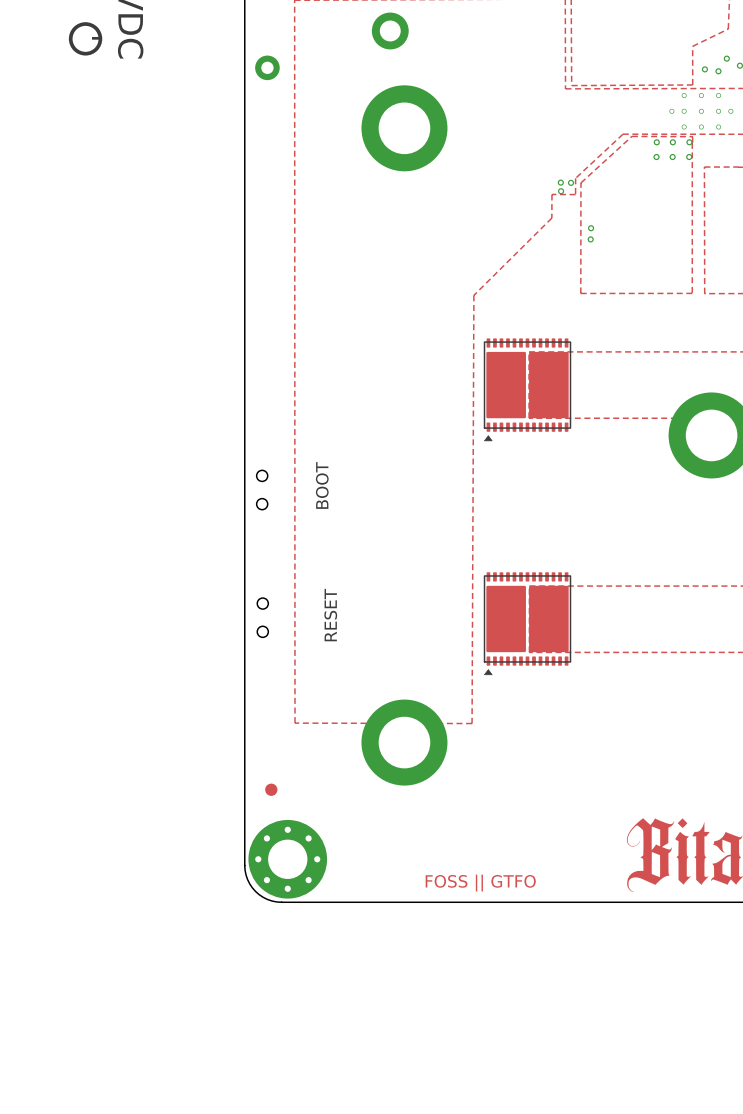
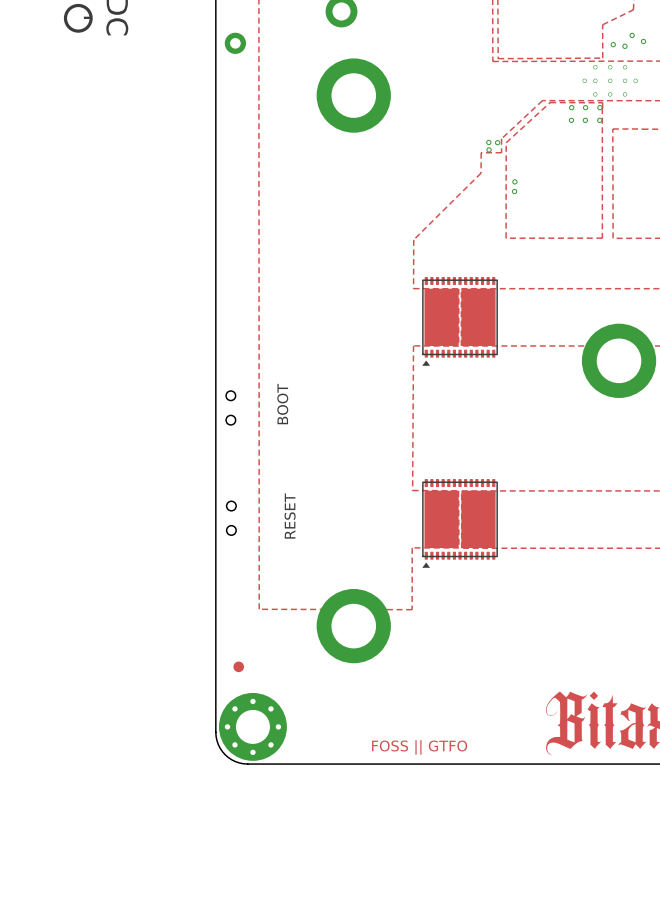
zone outline: (473, 295) (472, 723) -> (413, 239) (413, 288) (458, 288) (458, 346) (413, 345) (412, 490) (458, 490) (458, 547) (412, 547) (412, 609)

